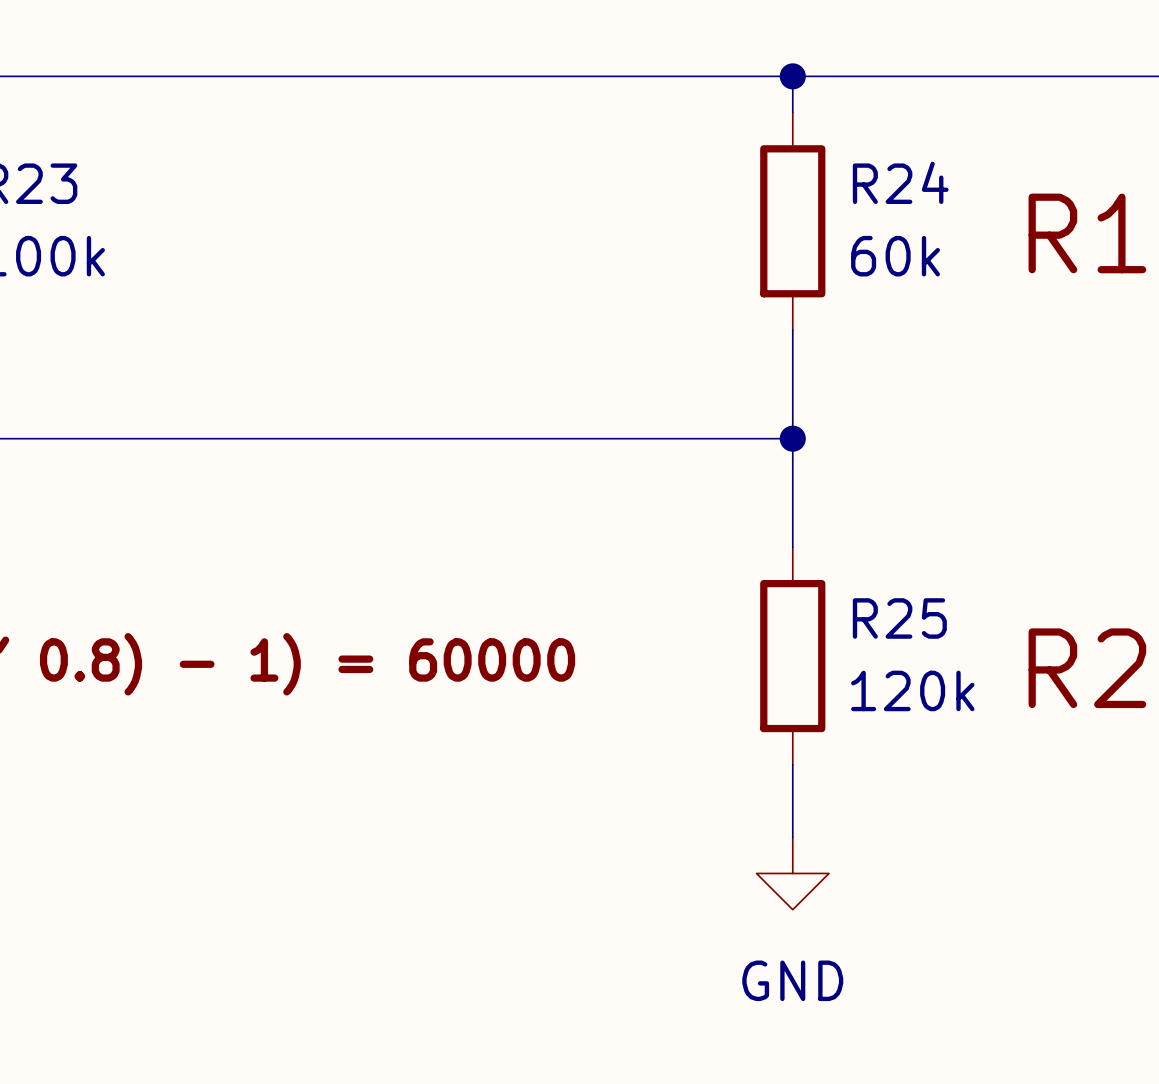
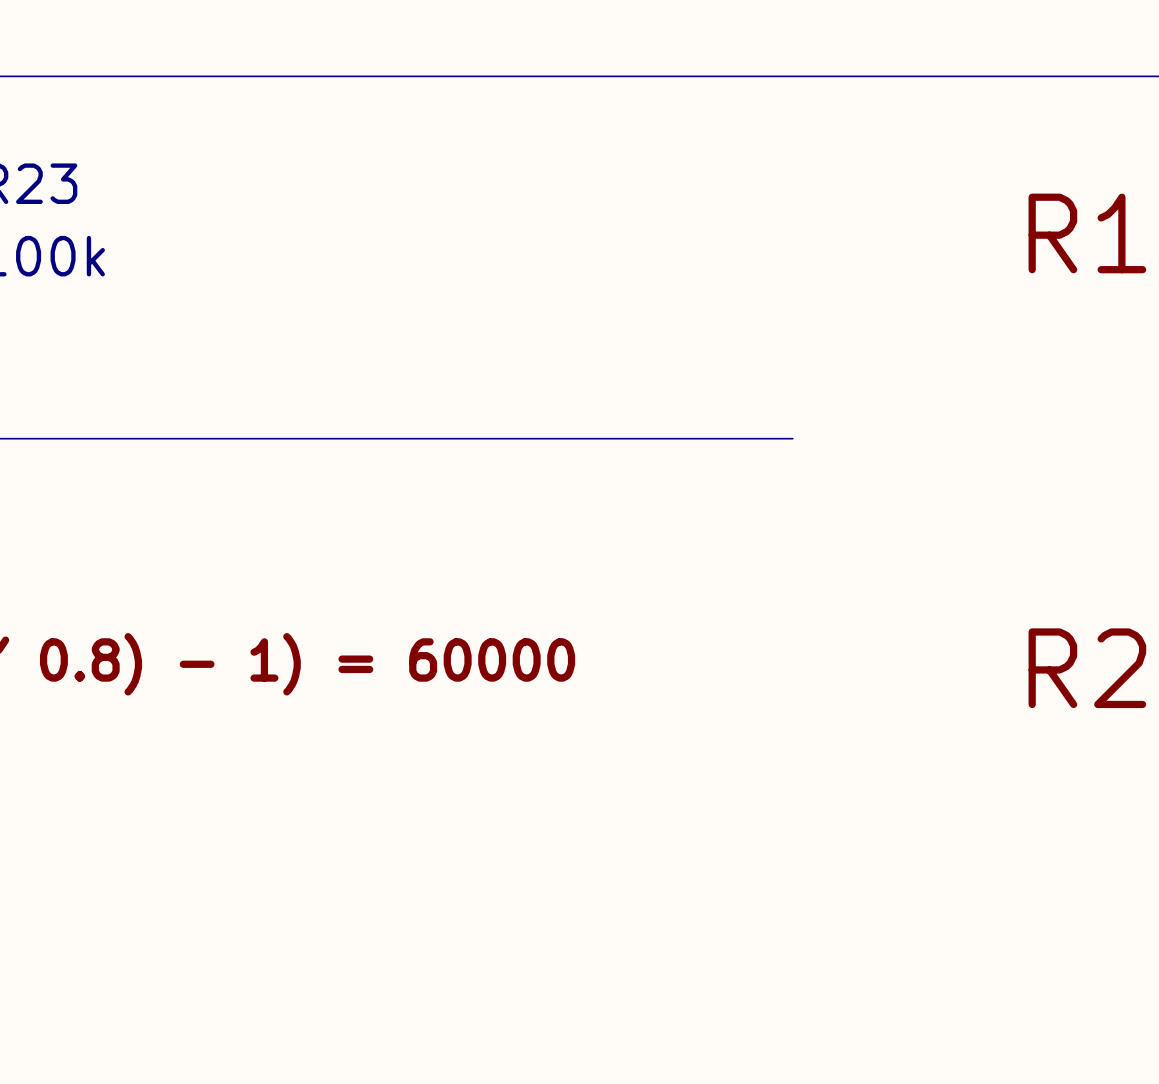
wire: (792, 76) (792, 112) -> none
junction: (792, 76) -> none
R24: 60k (792, 221) -> none
wire: (792, 329) (792, 547) -> none
junction: (792, 438) -> none
R25: 120k (792, 656) -> none
wire: (792, 764) (792, 837) -> none
power symbol: GND (792, 873) -> none

